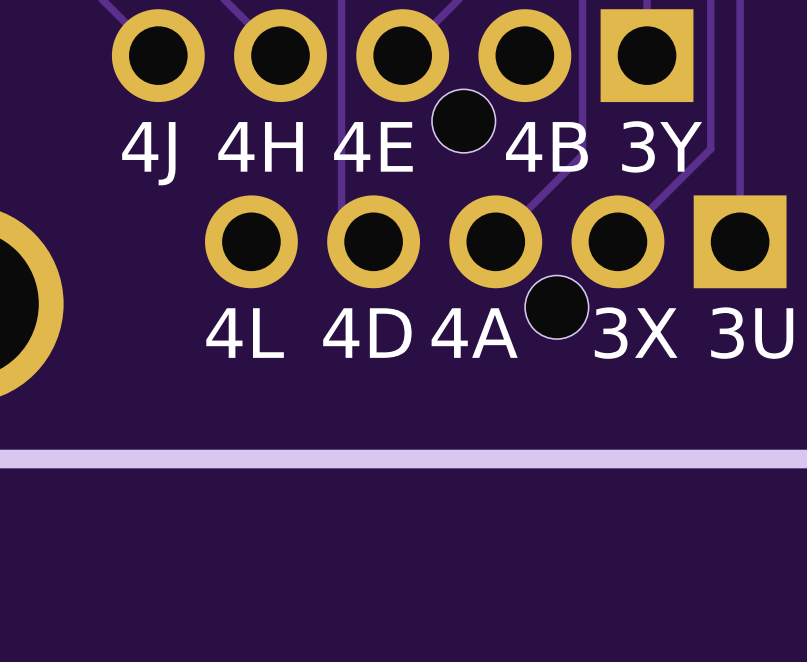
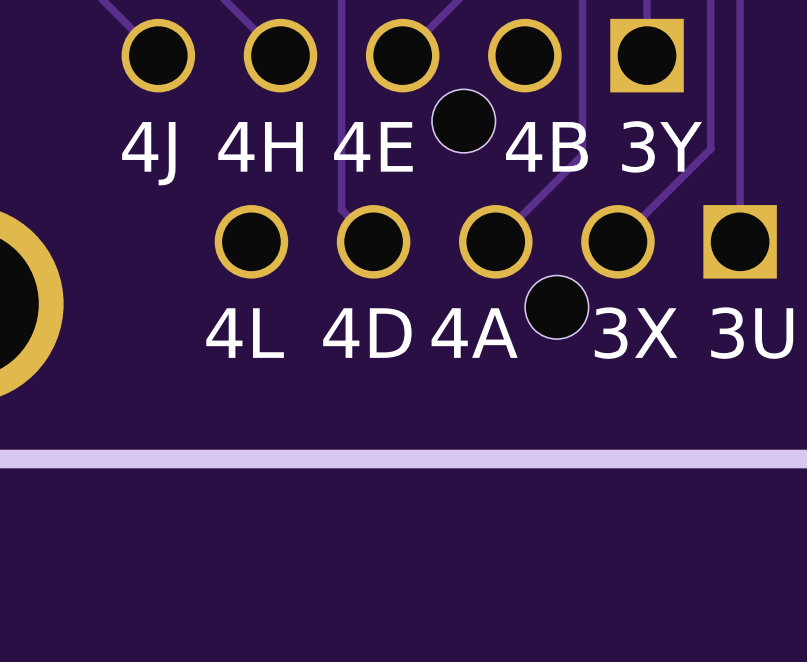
part footprint: [111, 9, 694, 153] -> [121, 18, 684, 153]
part footprint: [205, 195, 787, 340] -> [214, 205, 777, 340]

